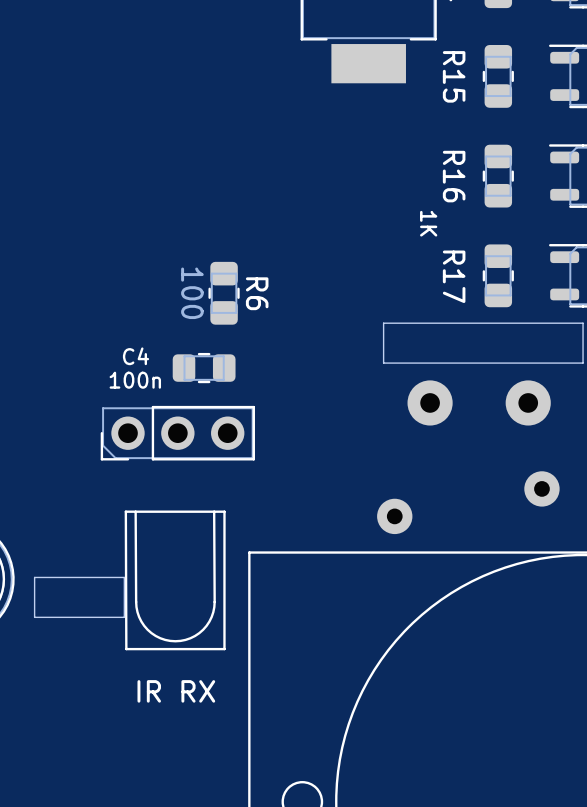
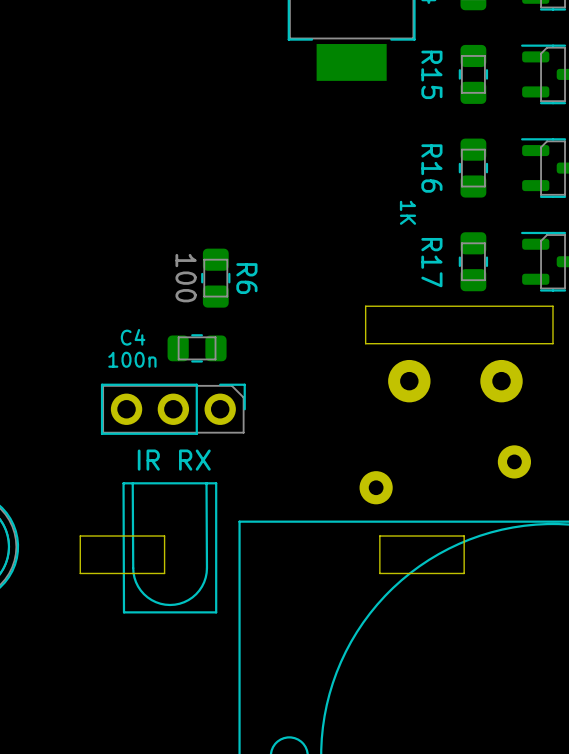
part rotation: 0° (177, 433) -> 180° (173, 409)
board edge: none -> (464, 536) (379, 536) (379, 573) (464, 573) (464, 536)
board edge: (124, 577) (34, 577) (34, 617) (124, 617) (124, 577) -> (164, 536) (80, 536) (80, 573) (164, 573) (164, 536)
part value position: IR RX (176, 691) -> IR RX (174, 460)

